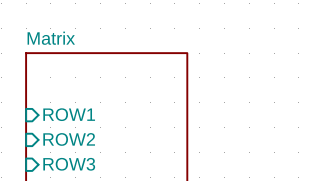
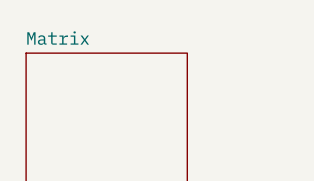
sheet pin: ROW1 (69, 114) -> none
sheet pin: ROW2 (69, 139) -> none
sheet pin: ROW3 (69, 164) -> none

